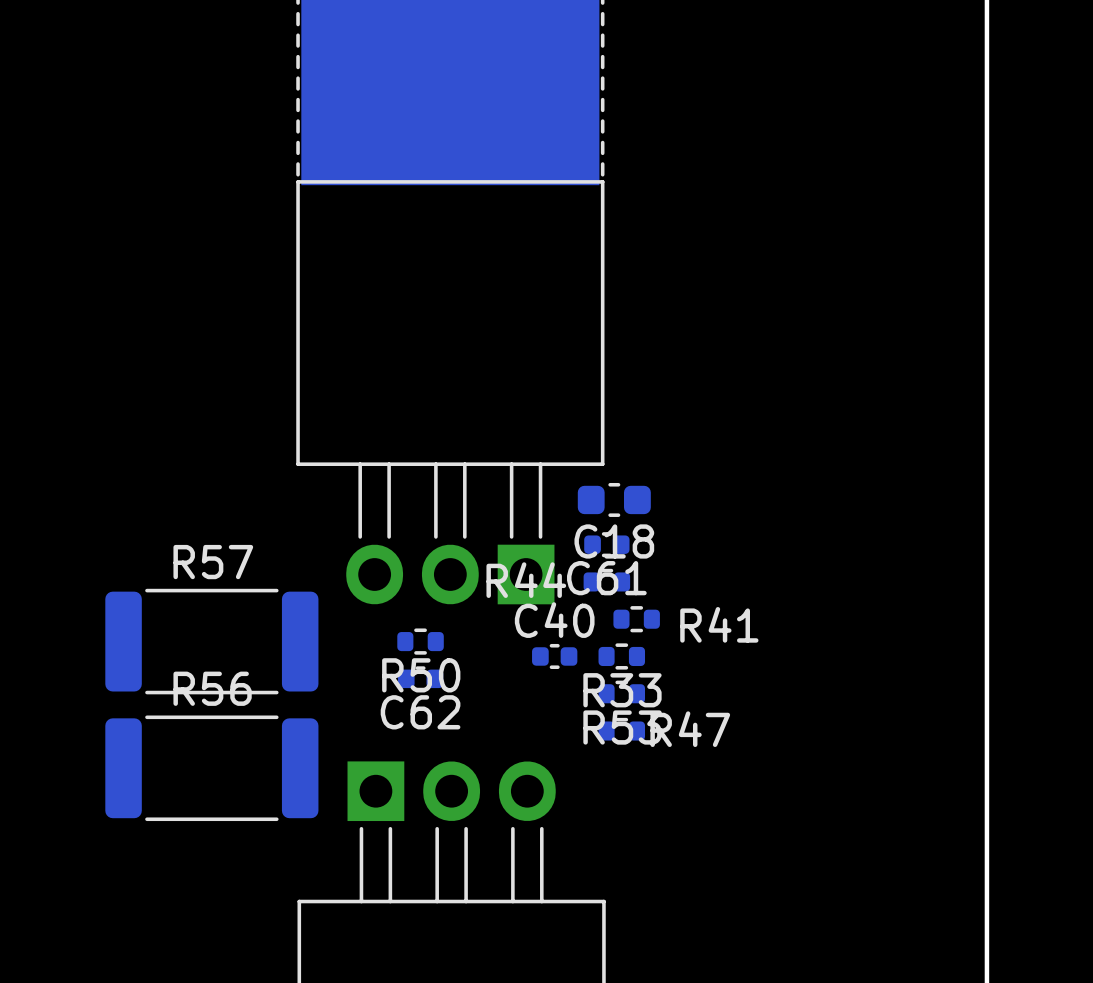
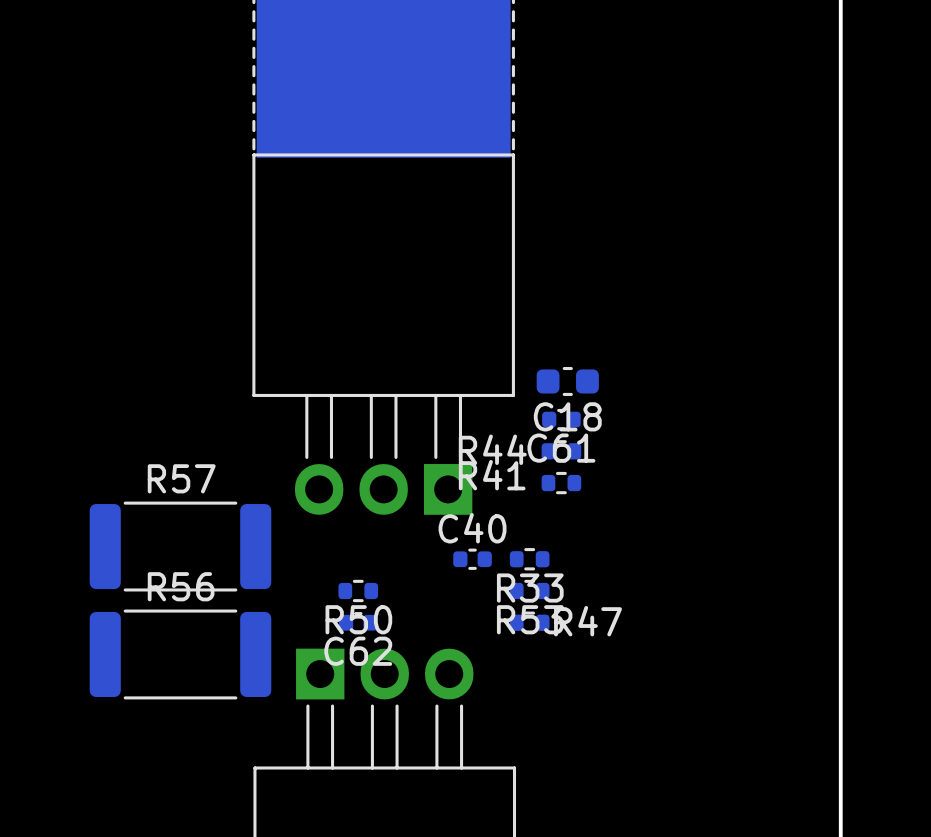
C18 position: (614, 499) -> (567, 381)
C61 position: (606, 544) -> (561, 419)
R44 position: (606, 581) -> (561, 451)
R41 position: (636, 619) -> (561, 483)
R41 name position: R41 (719, 624) -> R41 (492, 475)
R50 position: (420, 641) -> (358, 590)
C62 position: (420, 678) -> (358, 622)

